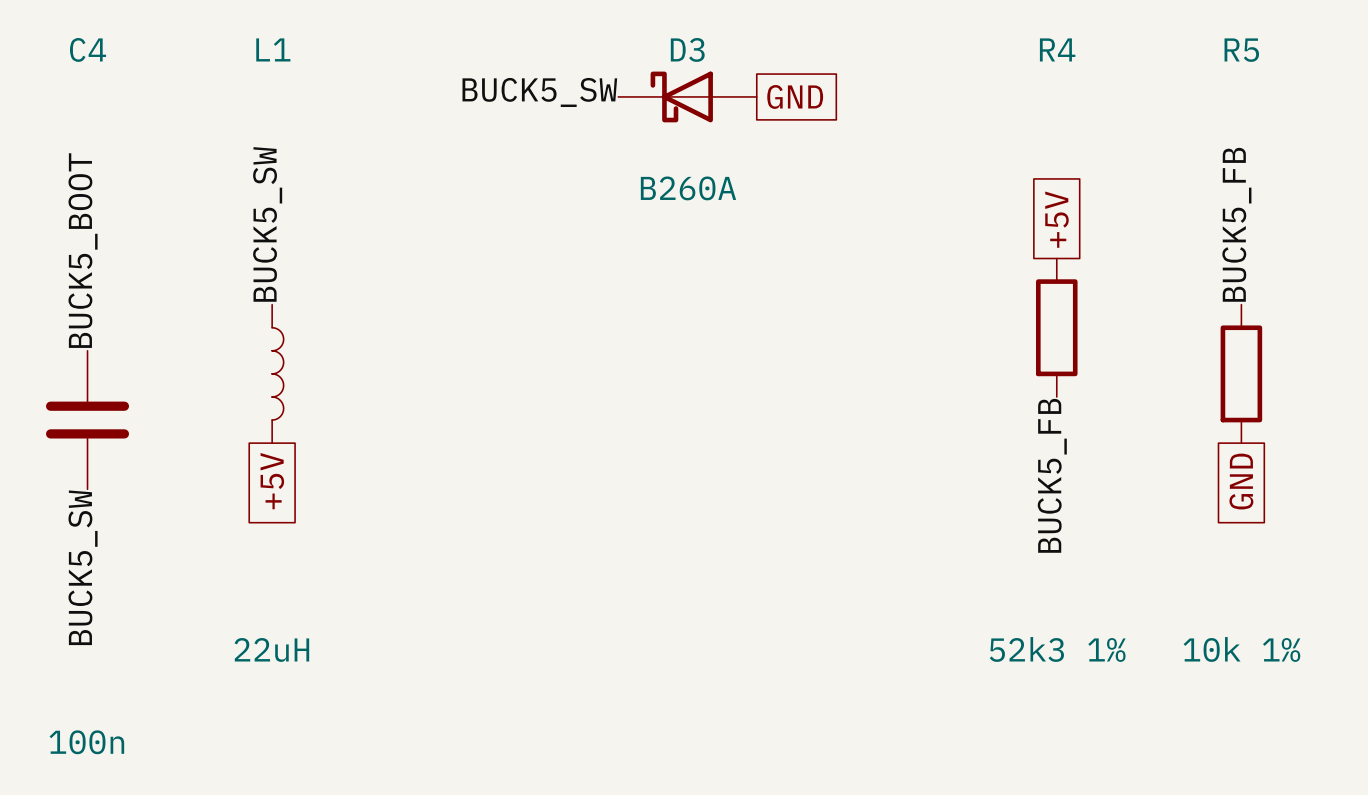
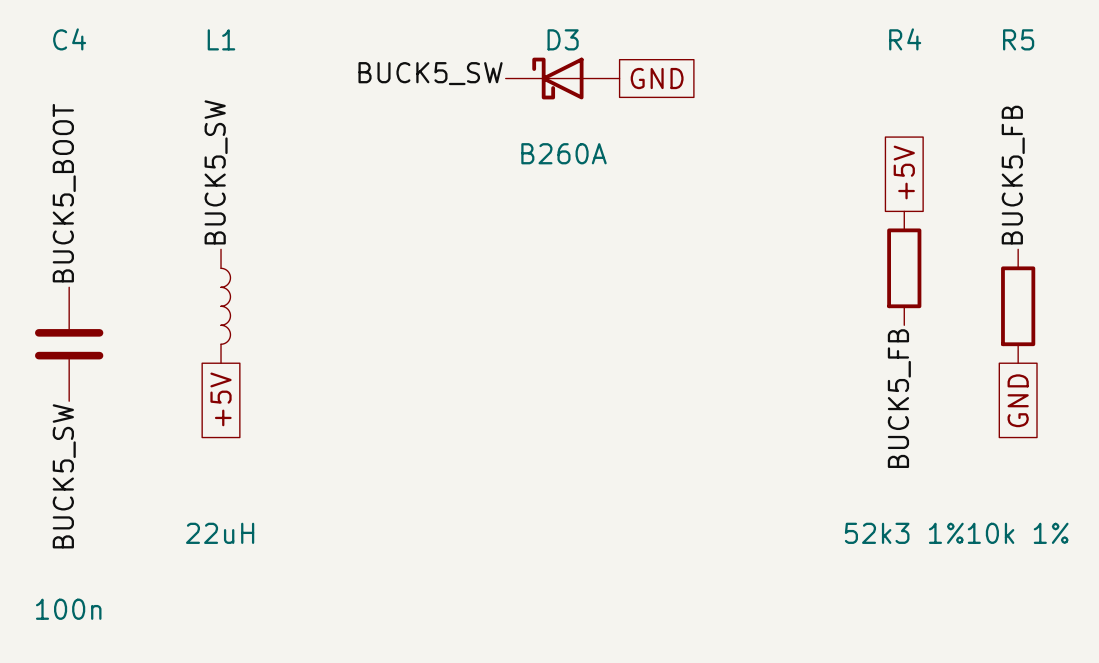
global label position: +5V (1056, 219) -> +5V (904, 172)
R4 position: (1056, 327) -> (904, 268)
label position: BUCK5_FB (1052, 475) -> BUCK5_FB (899, 398)

